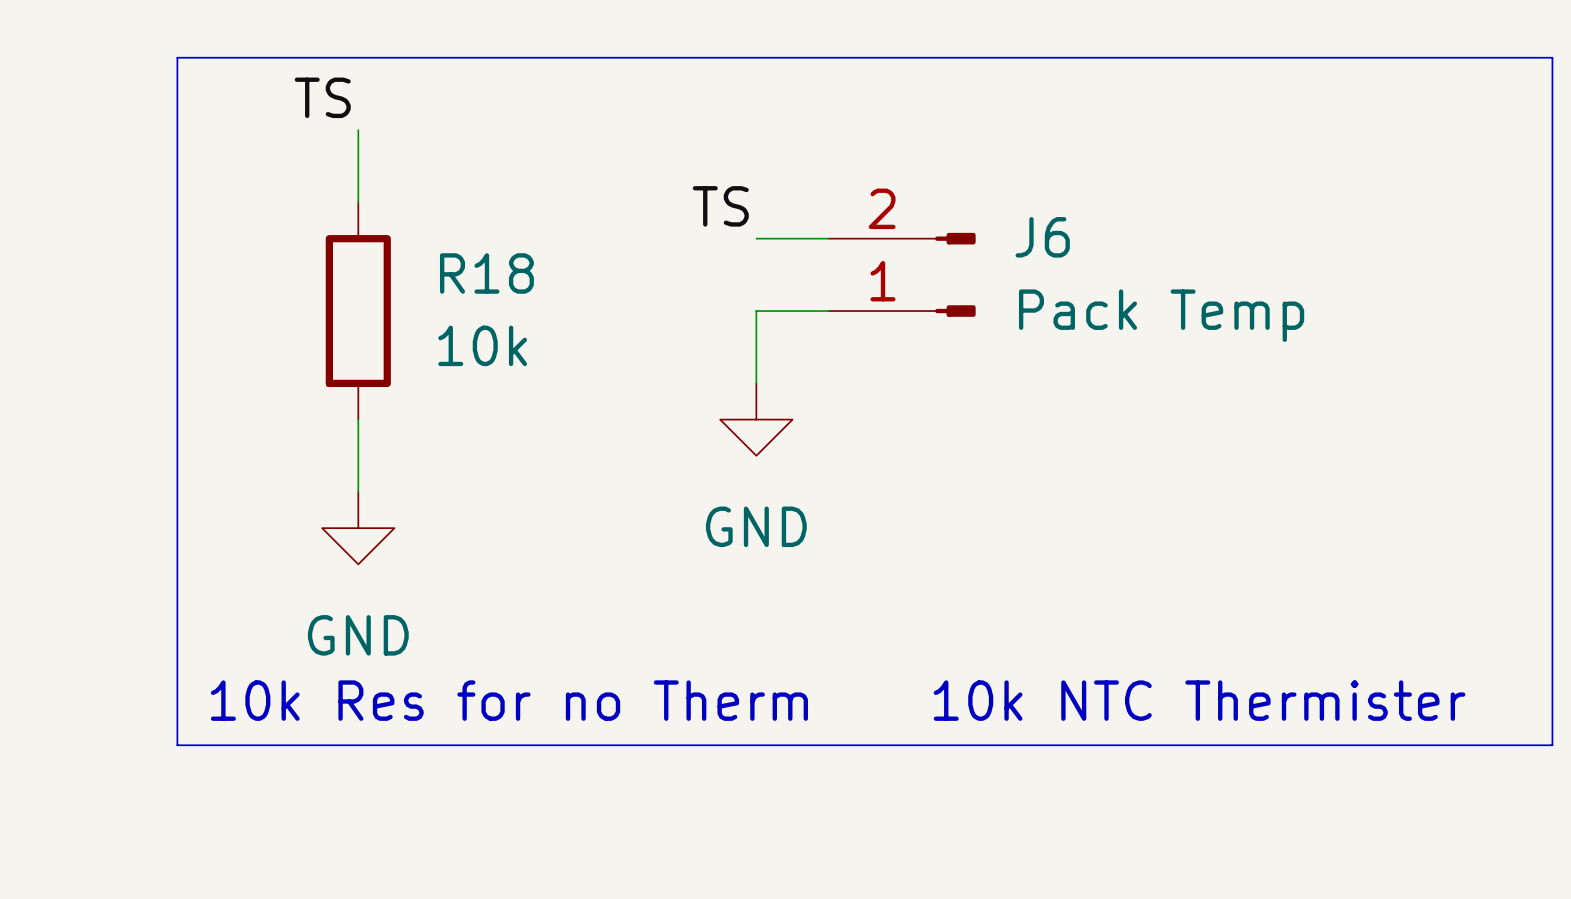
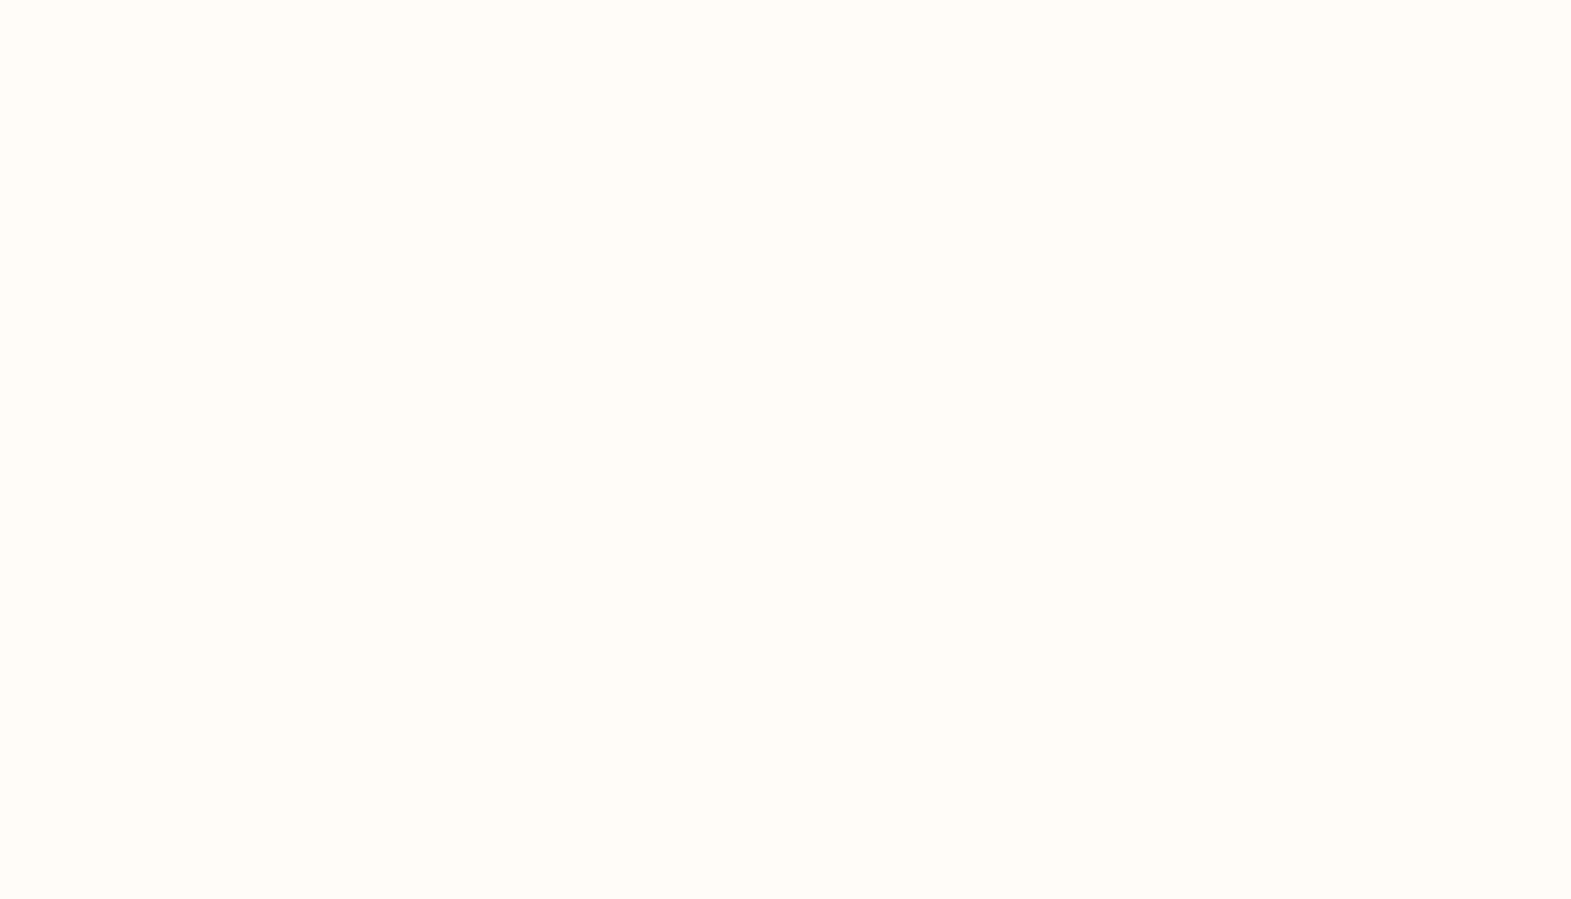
line: (177, 57) (1552, 57) (1552, 745) (177, 745) (177, 57) -> none
label: TS (322, 97) -> none
wire: (358, 130) (358, 202) -> none
label: TS (720, 206) -> none
wire: (756, 238) (828, 238) -> none
J6: Pack Temp (902, 274) -> none
R18: 10k (358, 311) -> none
wire: (828, 311) (756, 311) (756, 383) -> none
wire: (358, 419) (358, 491) -> none
power symbol: GND (756, 419) -> none
power symbol: GND (358, 528) -> none
text: 10k Res for no Therm (509, 700) -> none
text: 10k NTC Thermister (1199, 700) -> none

